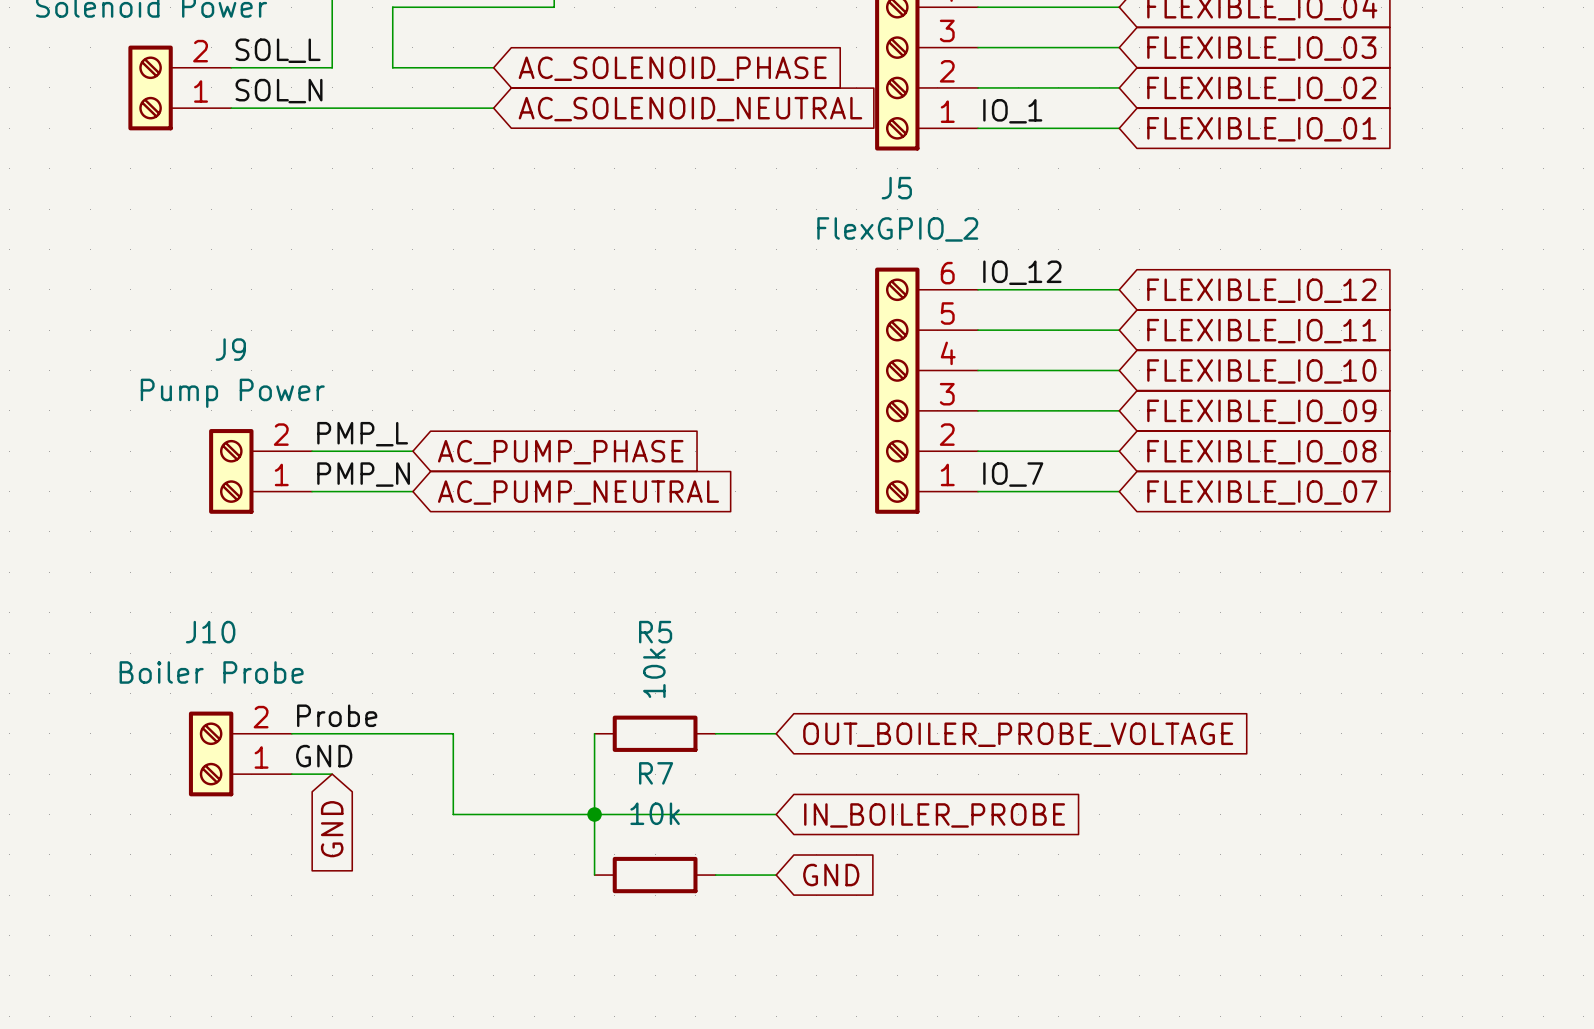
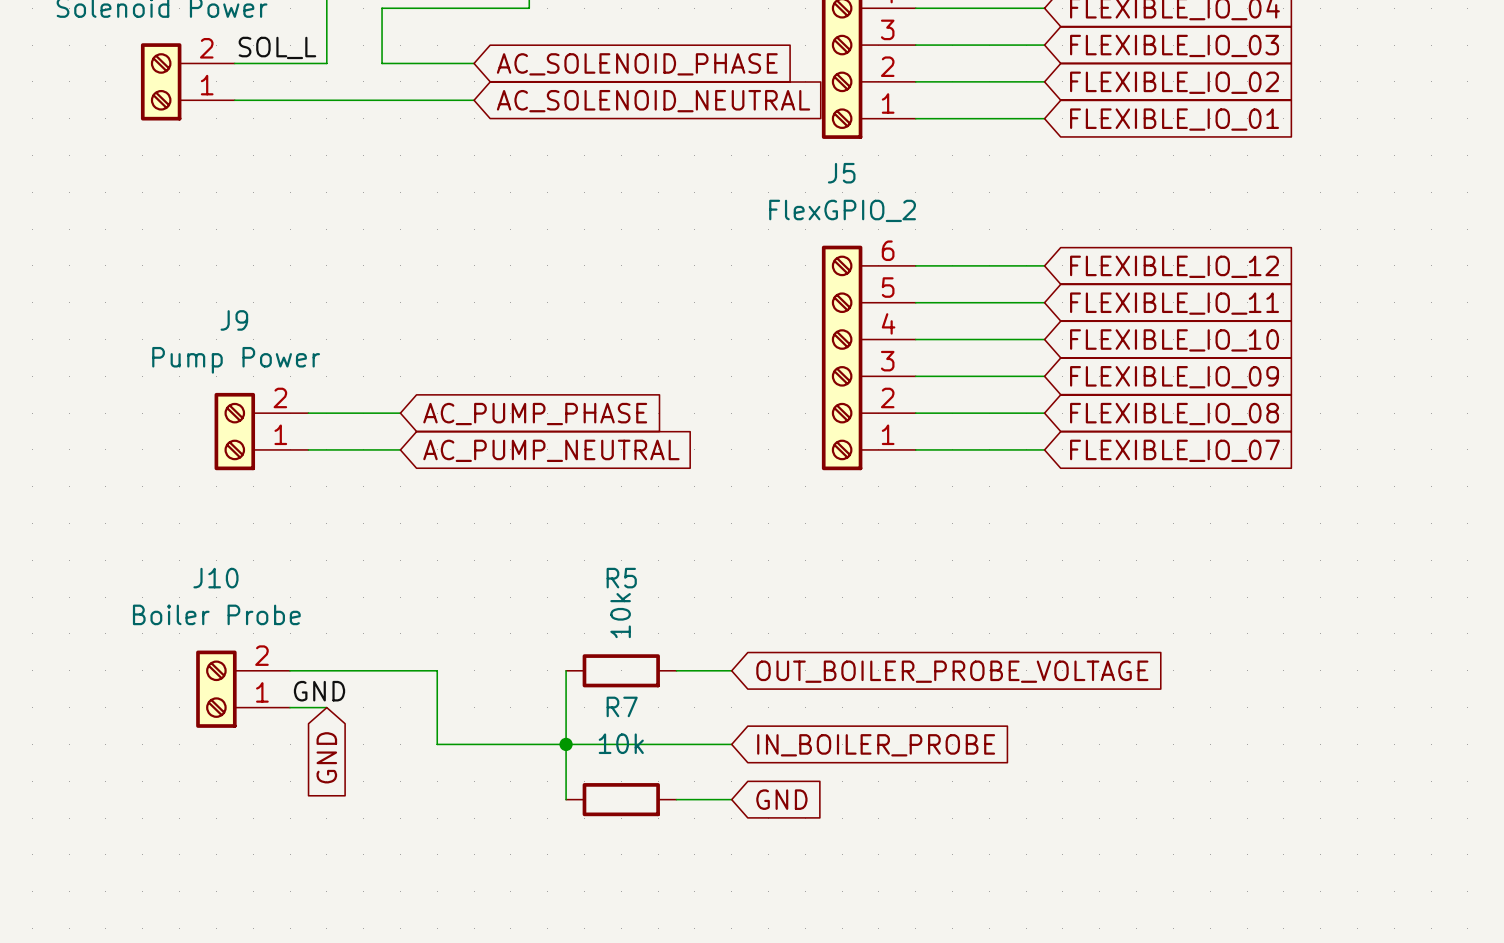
label: SOL_N (279, 91) -> none
label: IO_1 (1012, 111) -> none
label: IO_12 (1022, 272) -> none
label: PMP_L (362, 434) -> none
label: PMP_N (363, 474) -> none
label: IO_7 (1013, 474) -> none
label: Probe (337, 715) -> none

